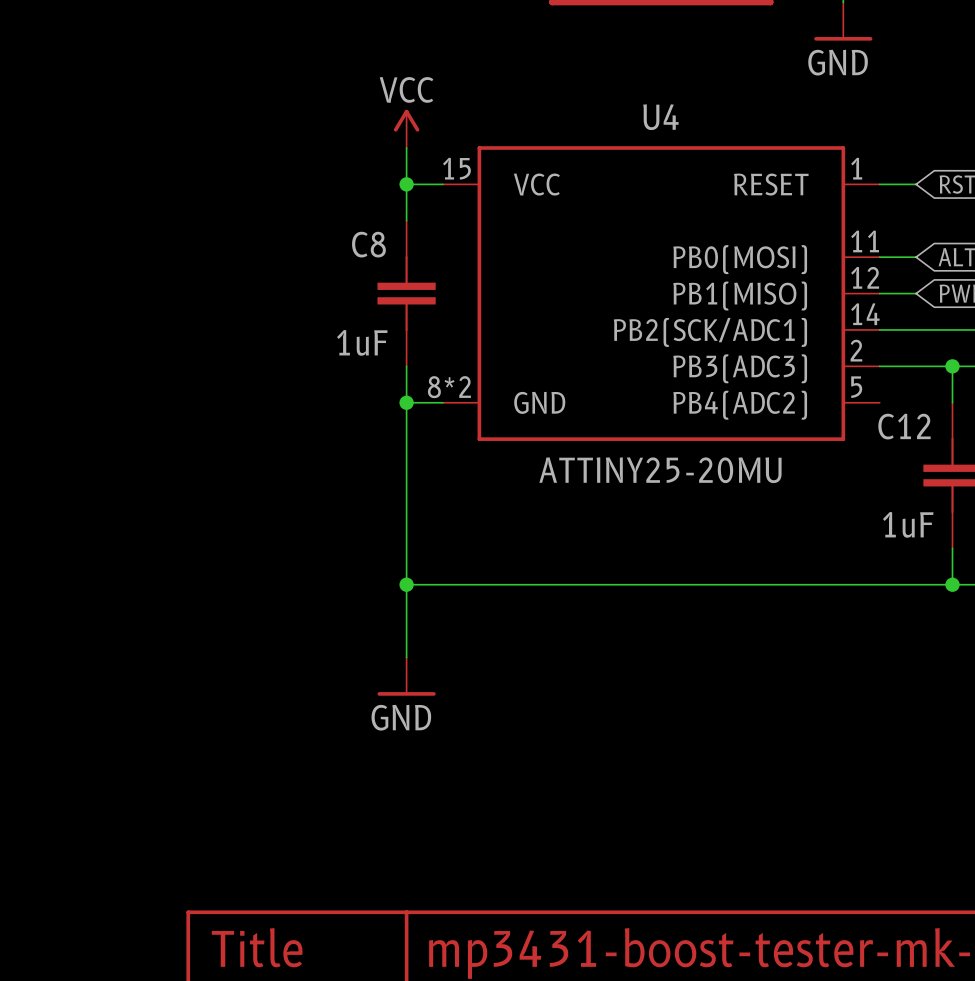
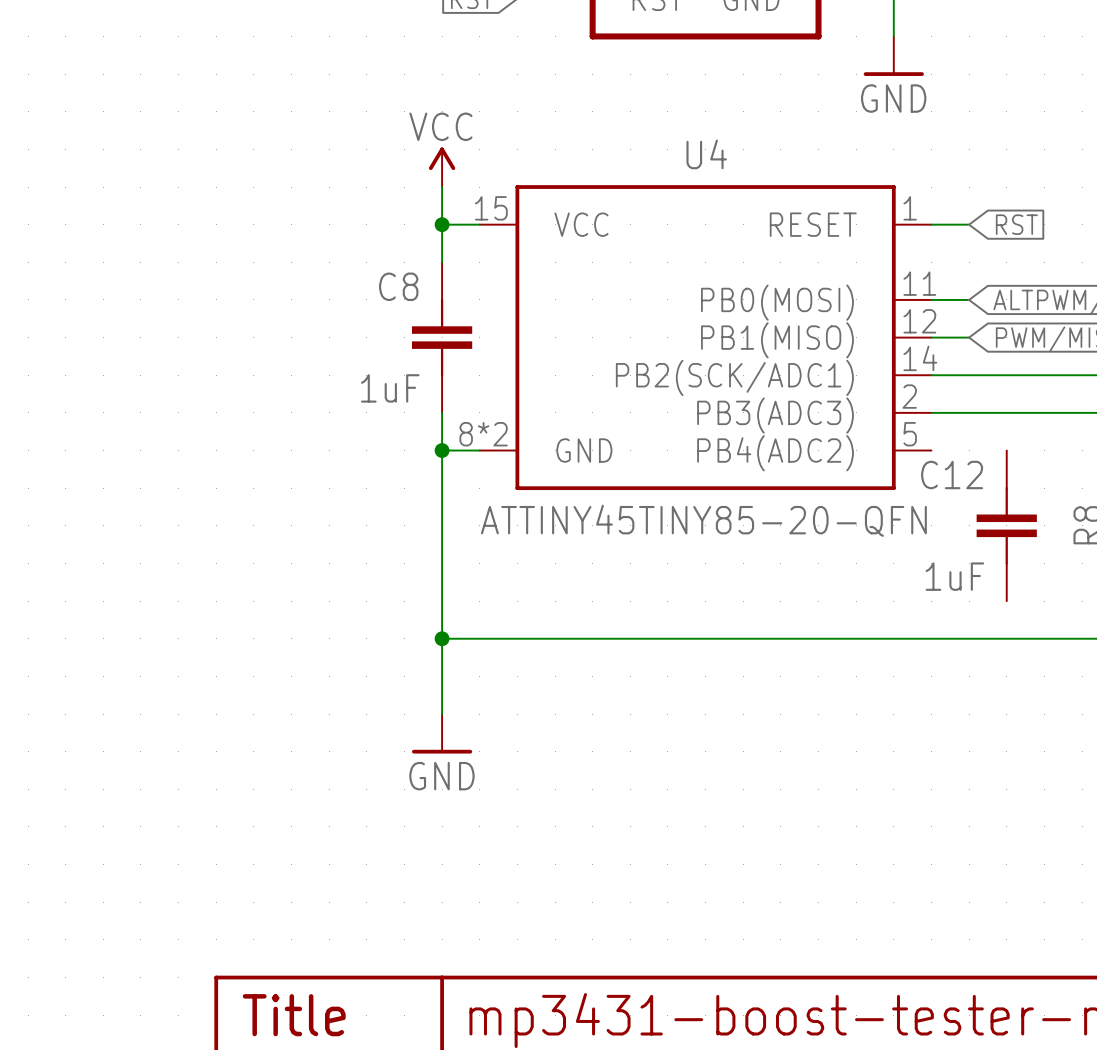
wire: (952, 366) (952, 402) -> none
junction: (952, 366) -> none
U4 value: ATTINY25-20MU (660, 470) -> ATTINY45TINY85-20-QFN (703, 520)
wire: (952, 548) (952, 584) -> none
junction: (952, 584) -> none

